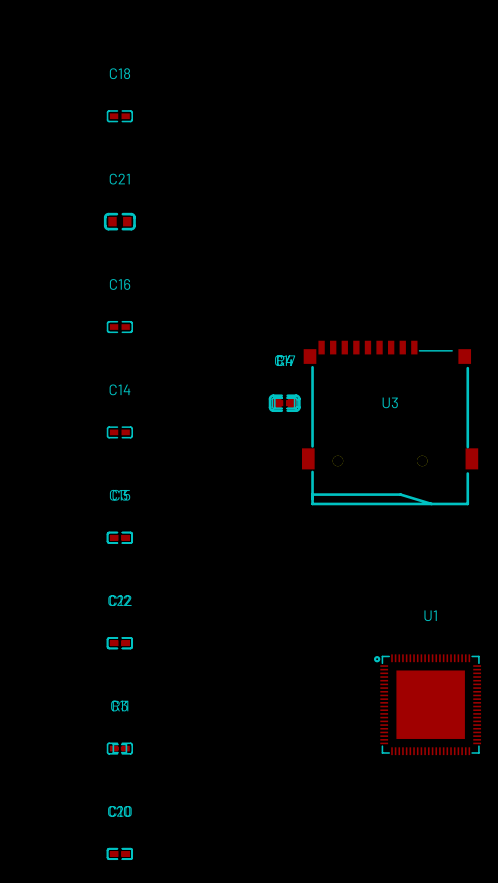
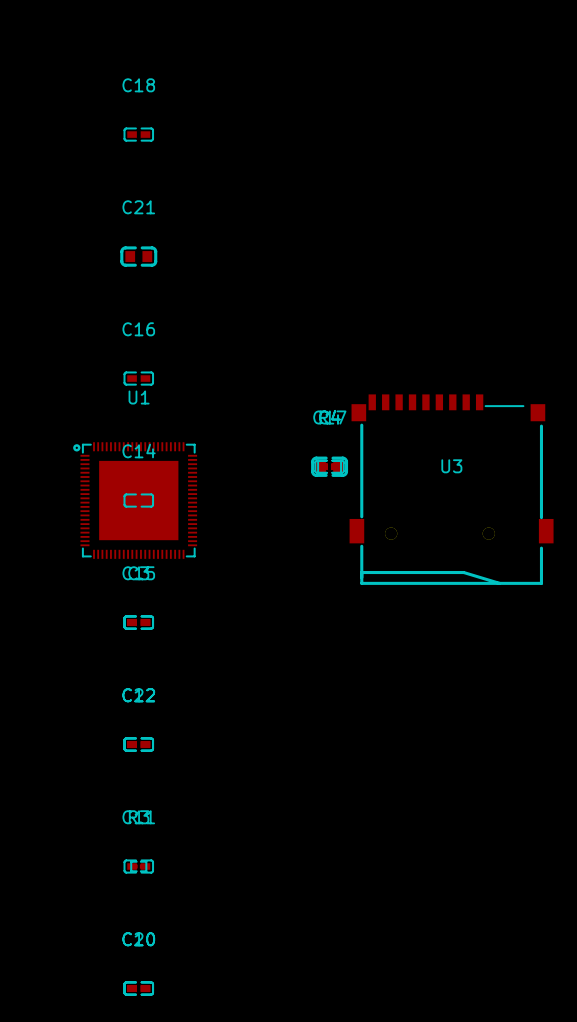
U1 position: (427, 704) -> (135, 500)

